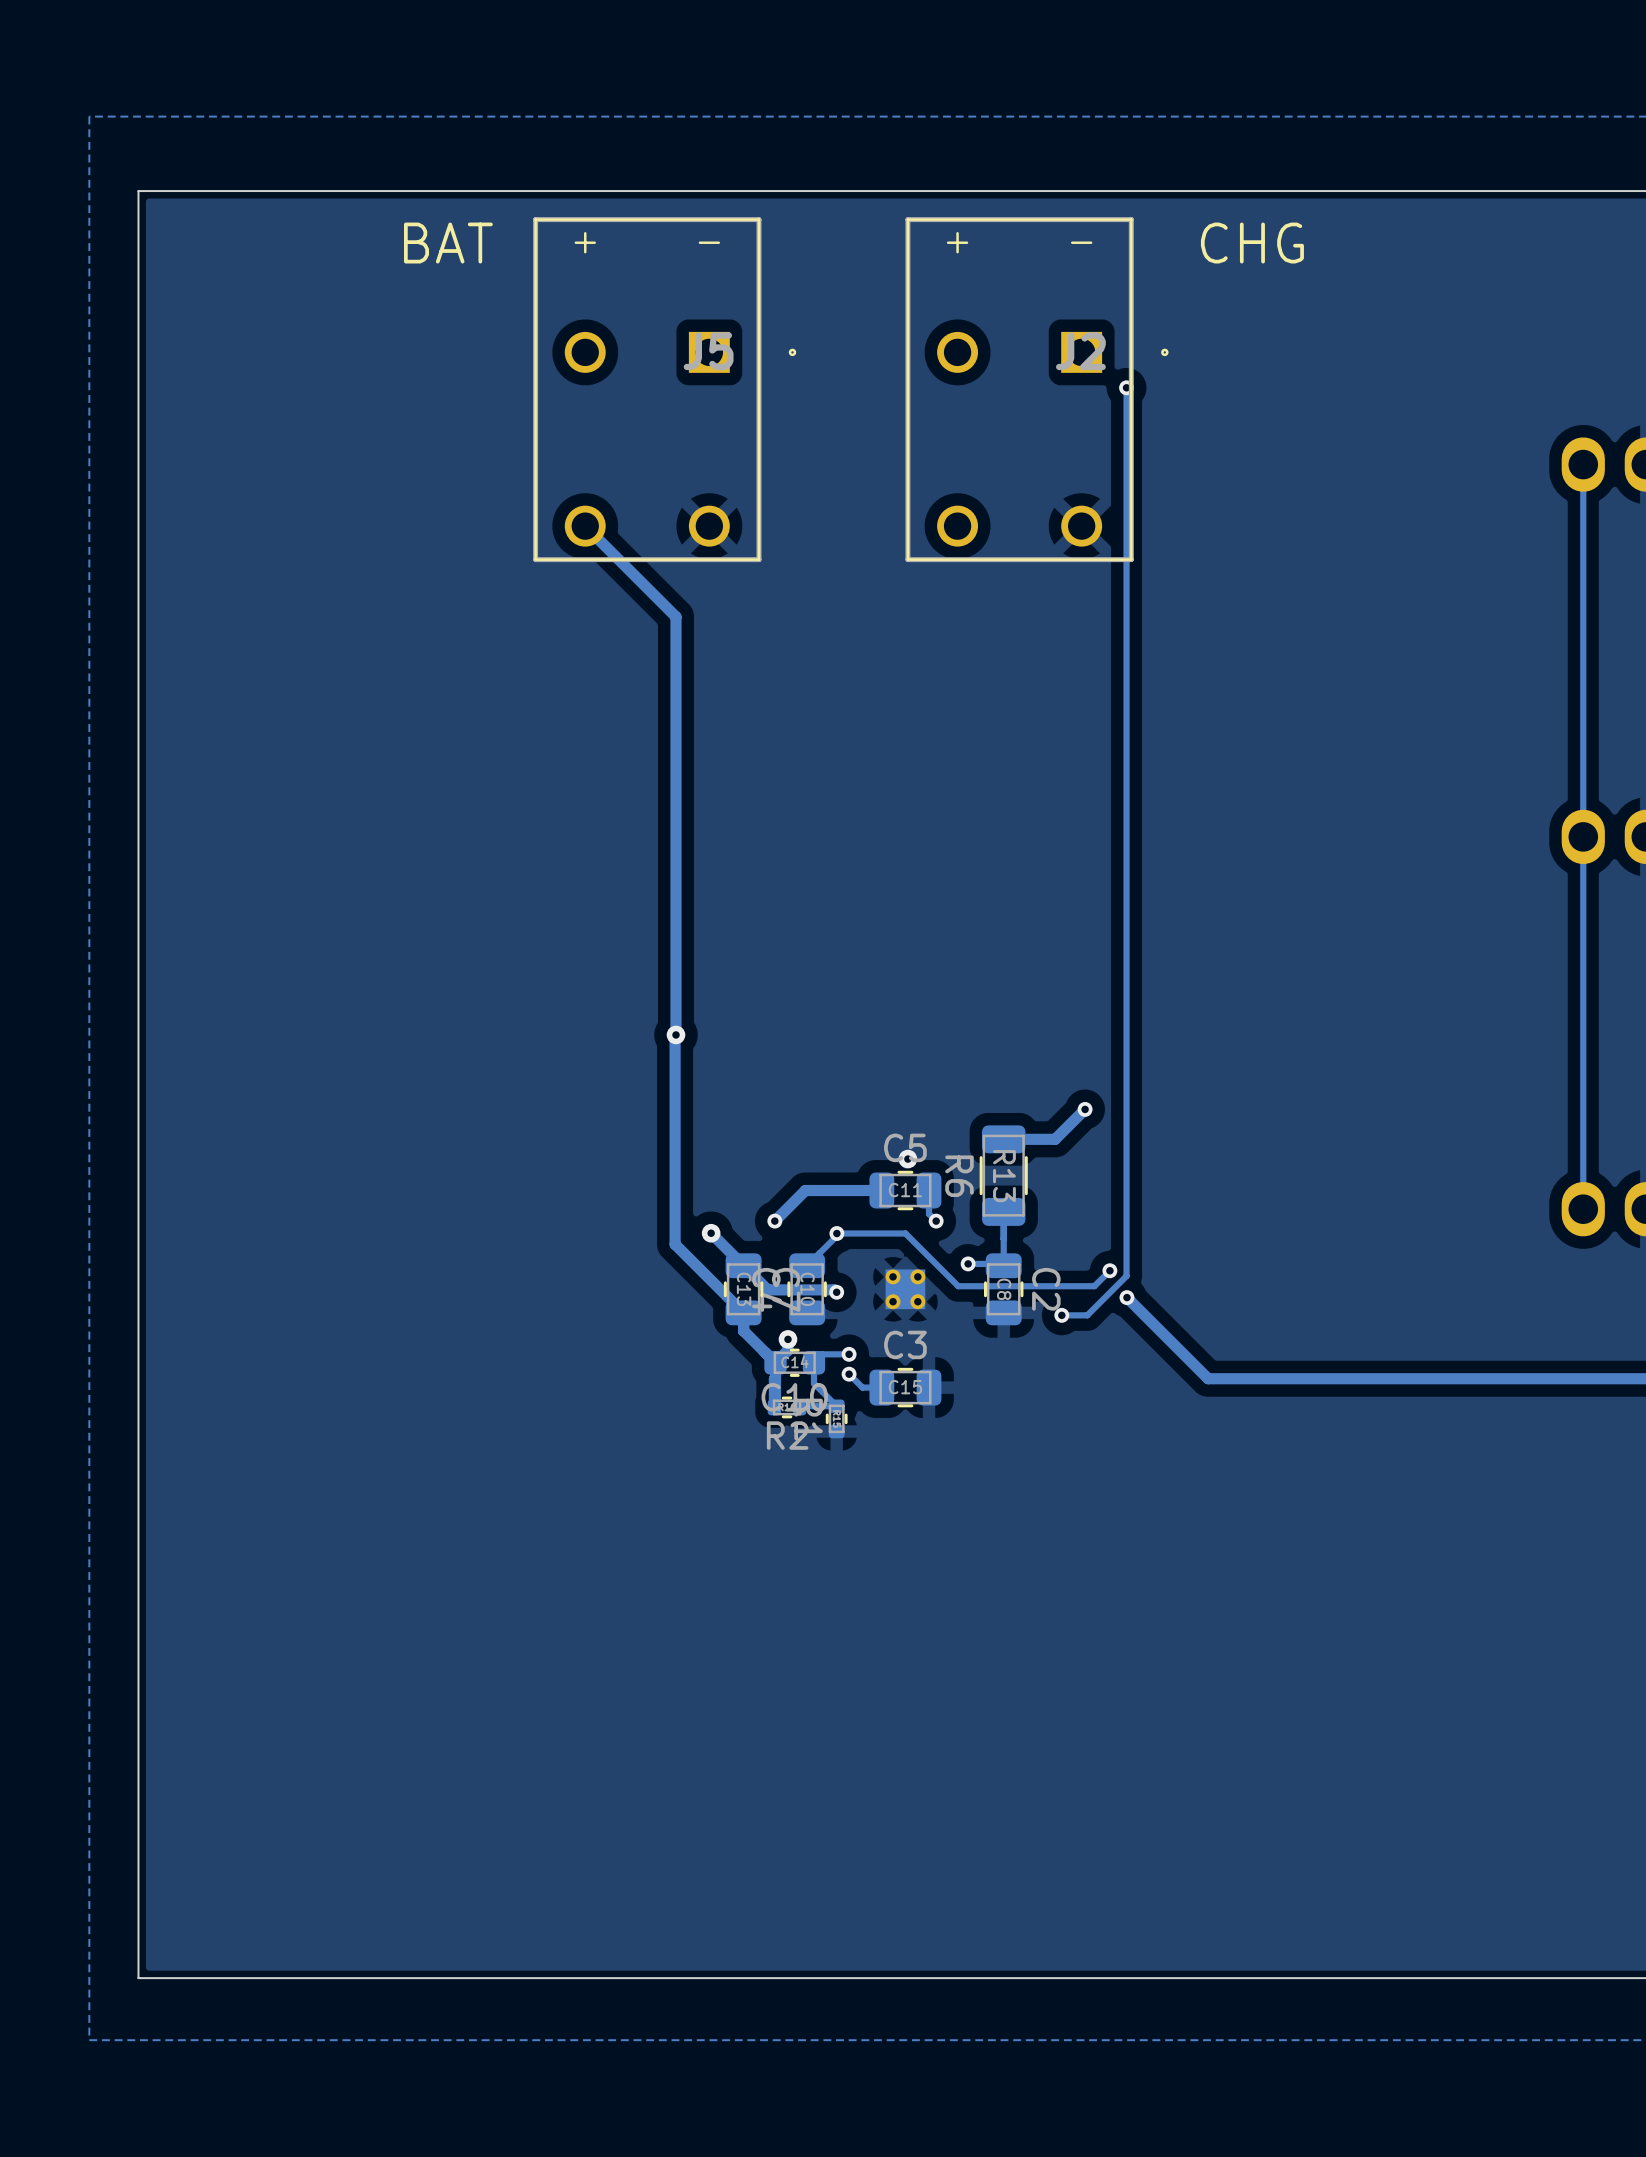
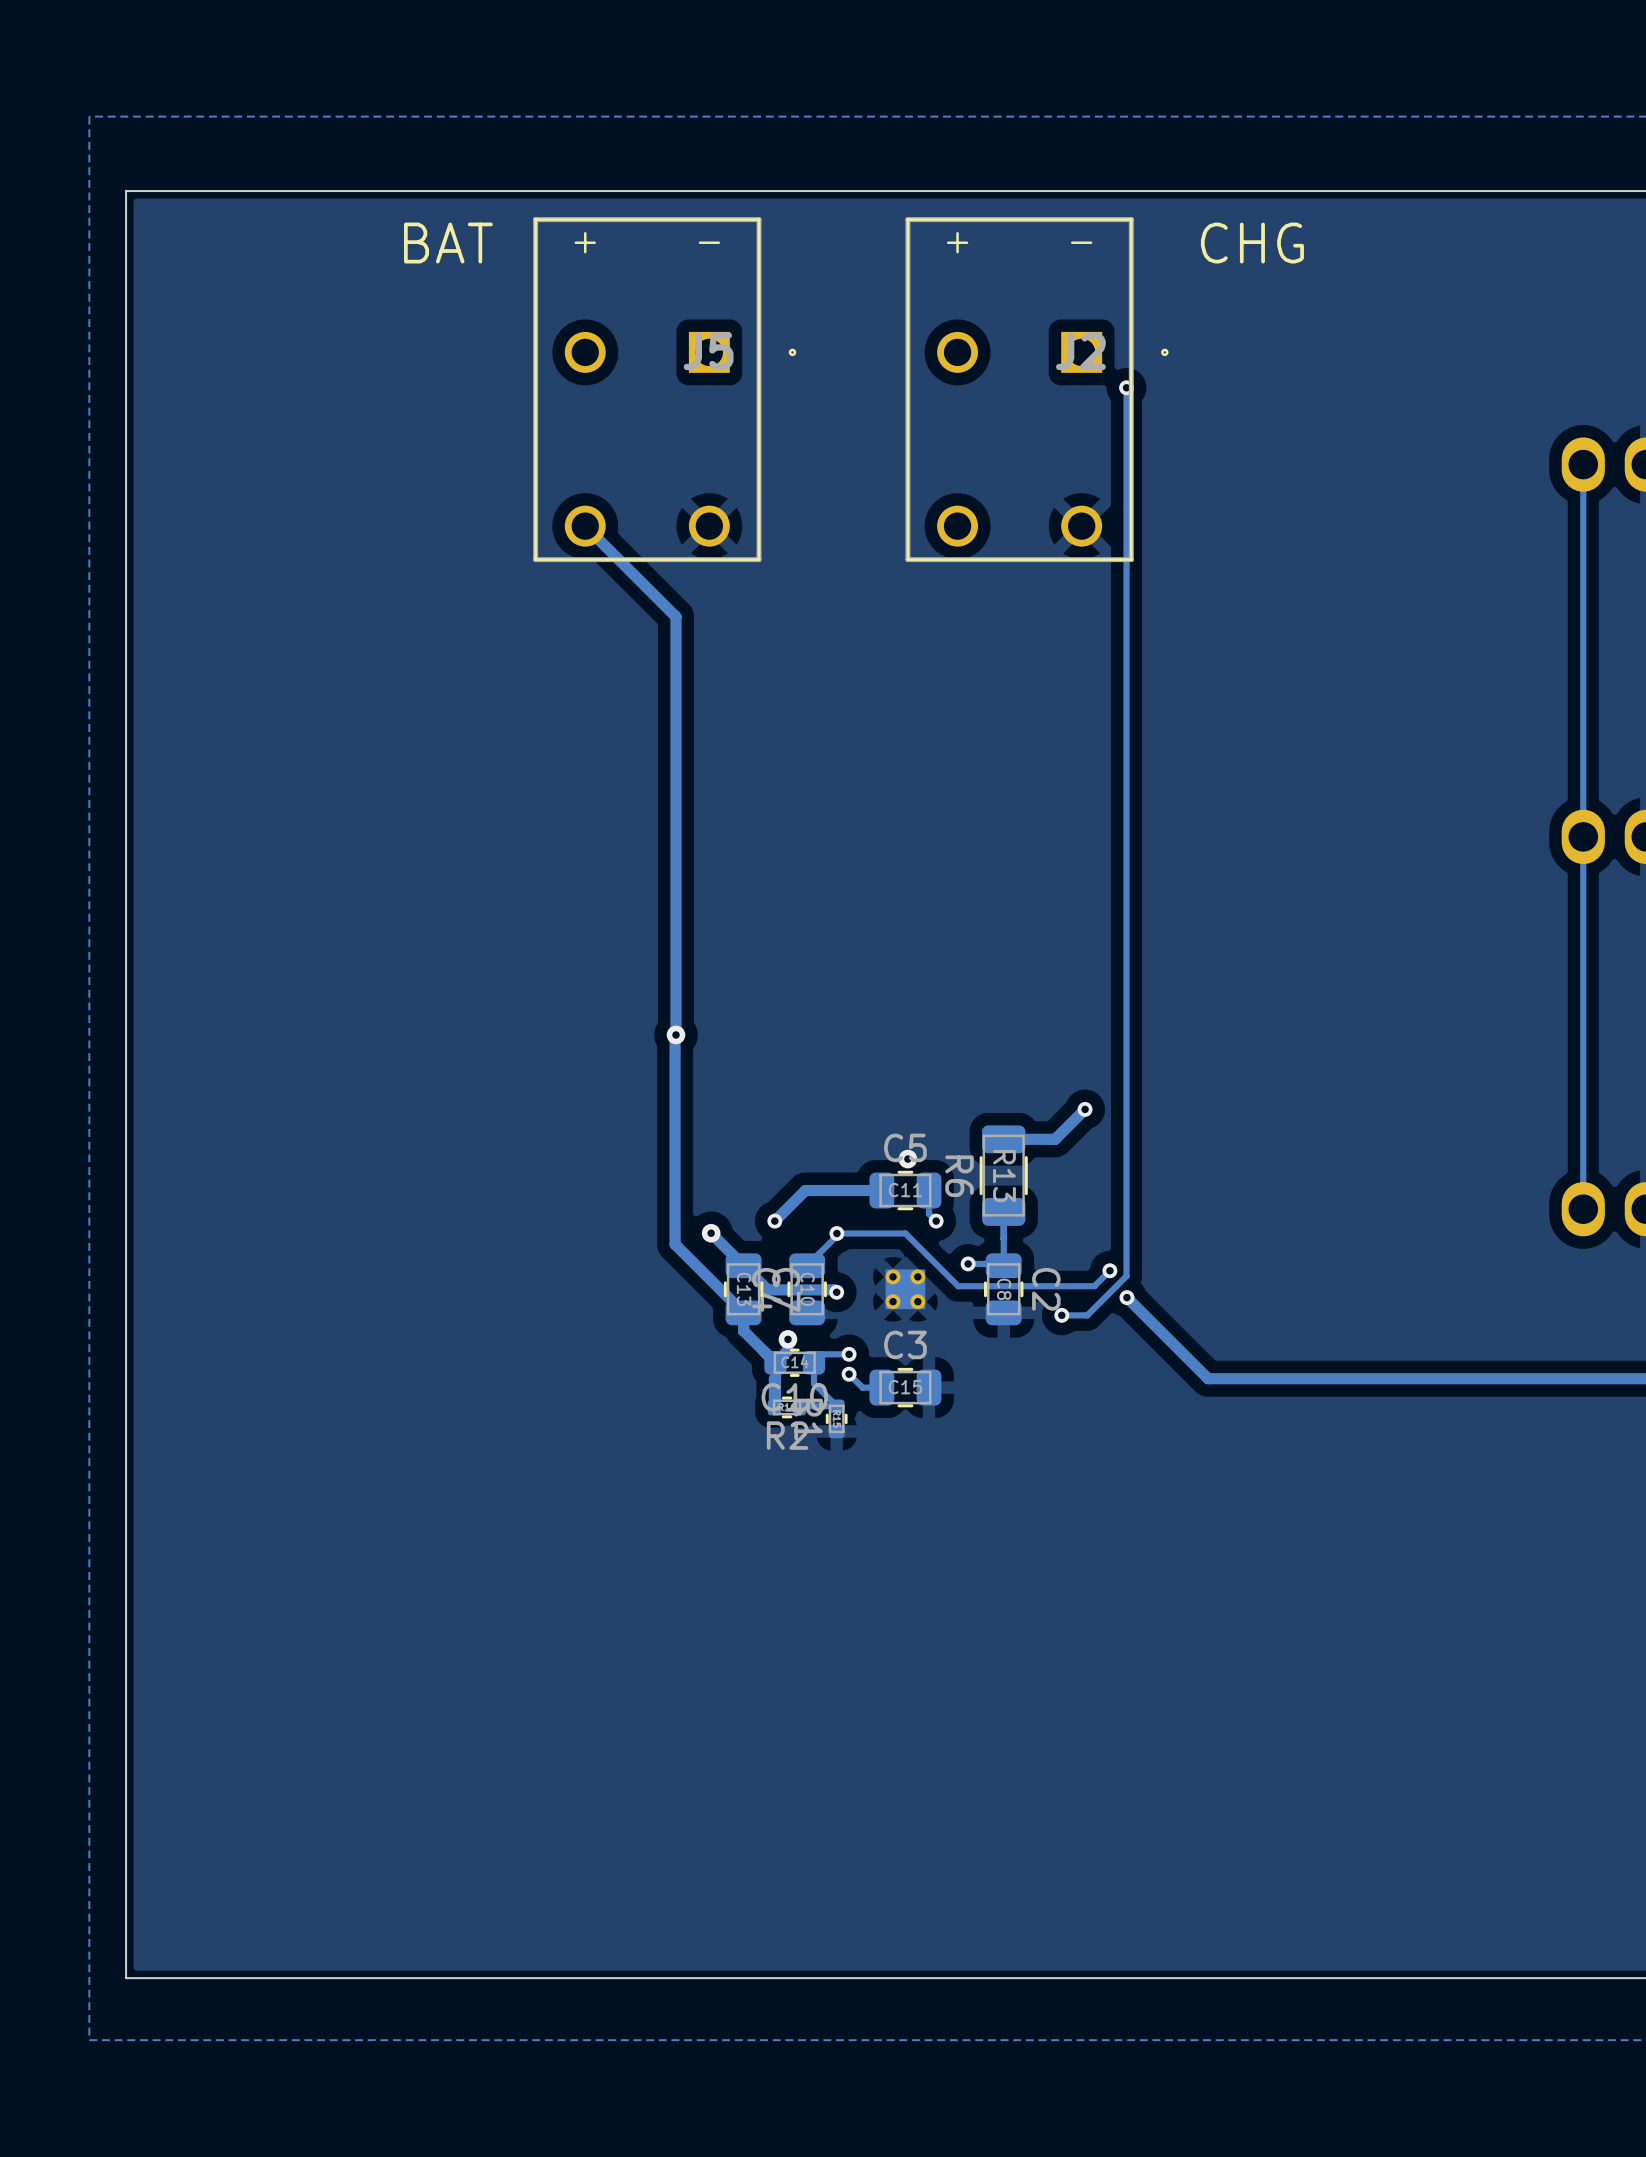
board edge: (138, 191) (138, 1978) -> (138, 191) (126, 191) (126, 1978) (138, 1978)

